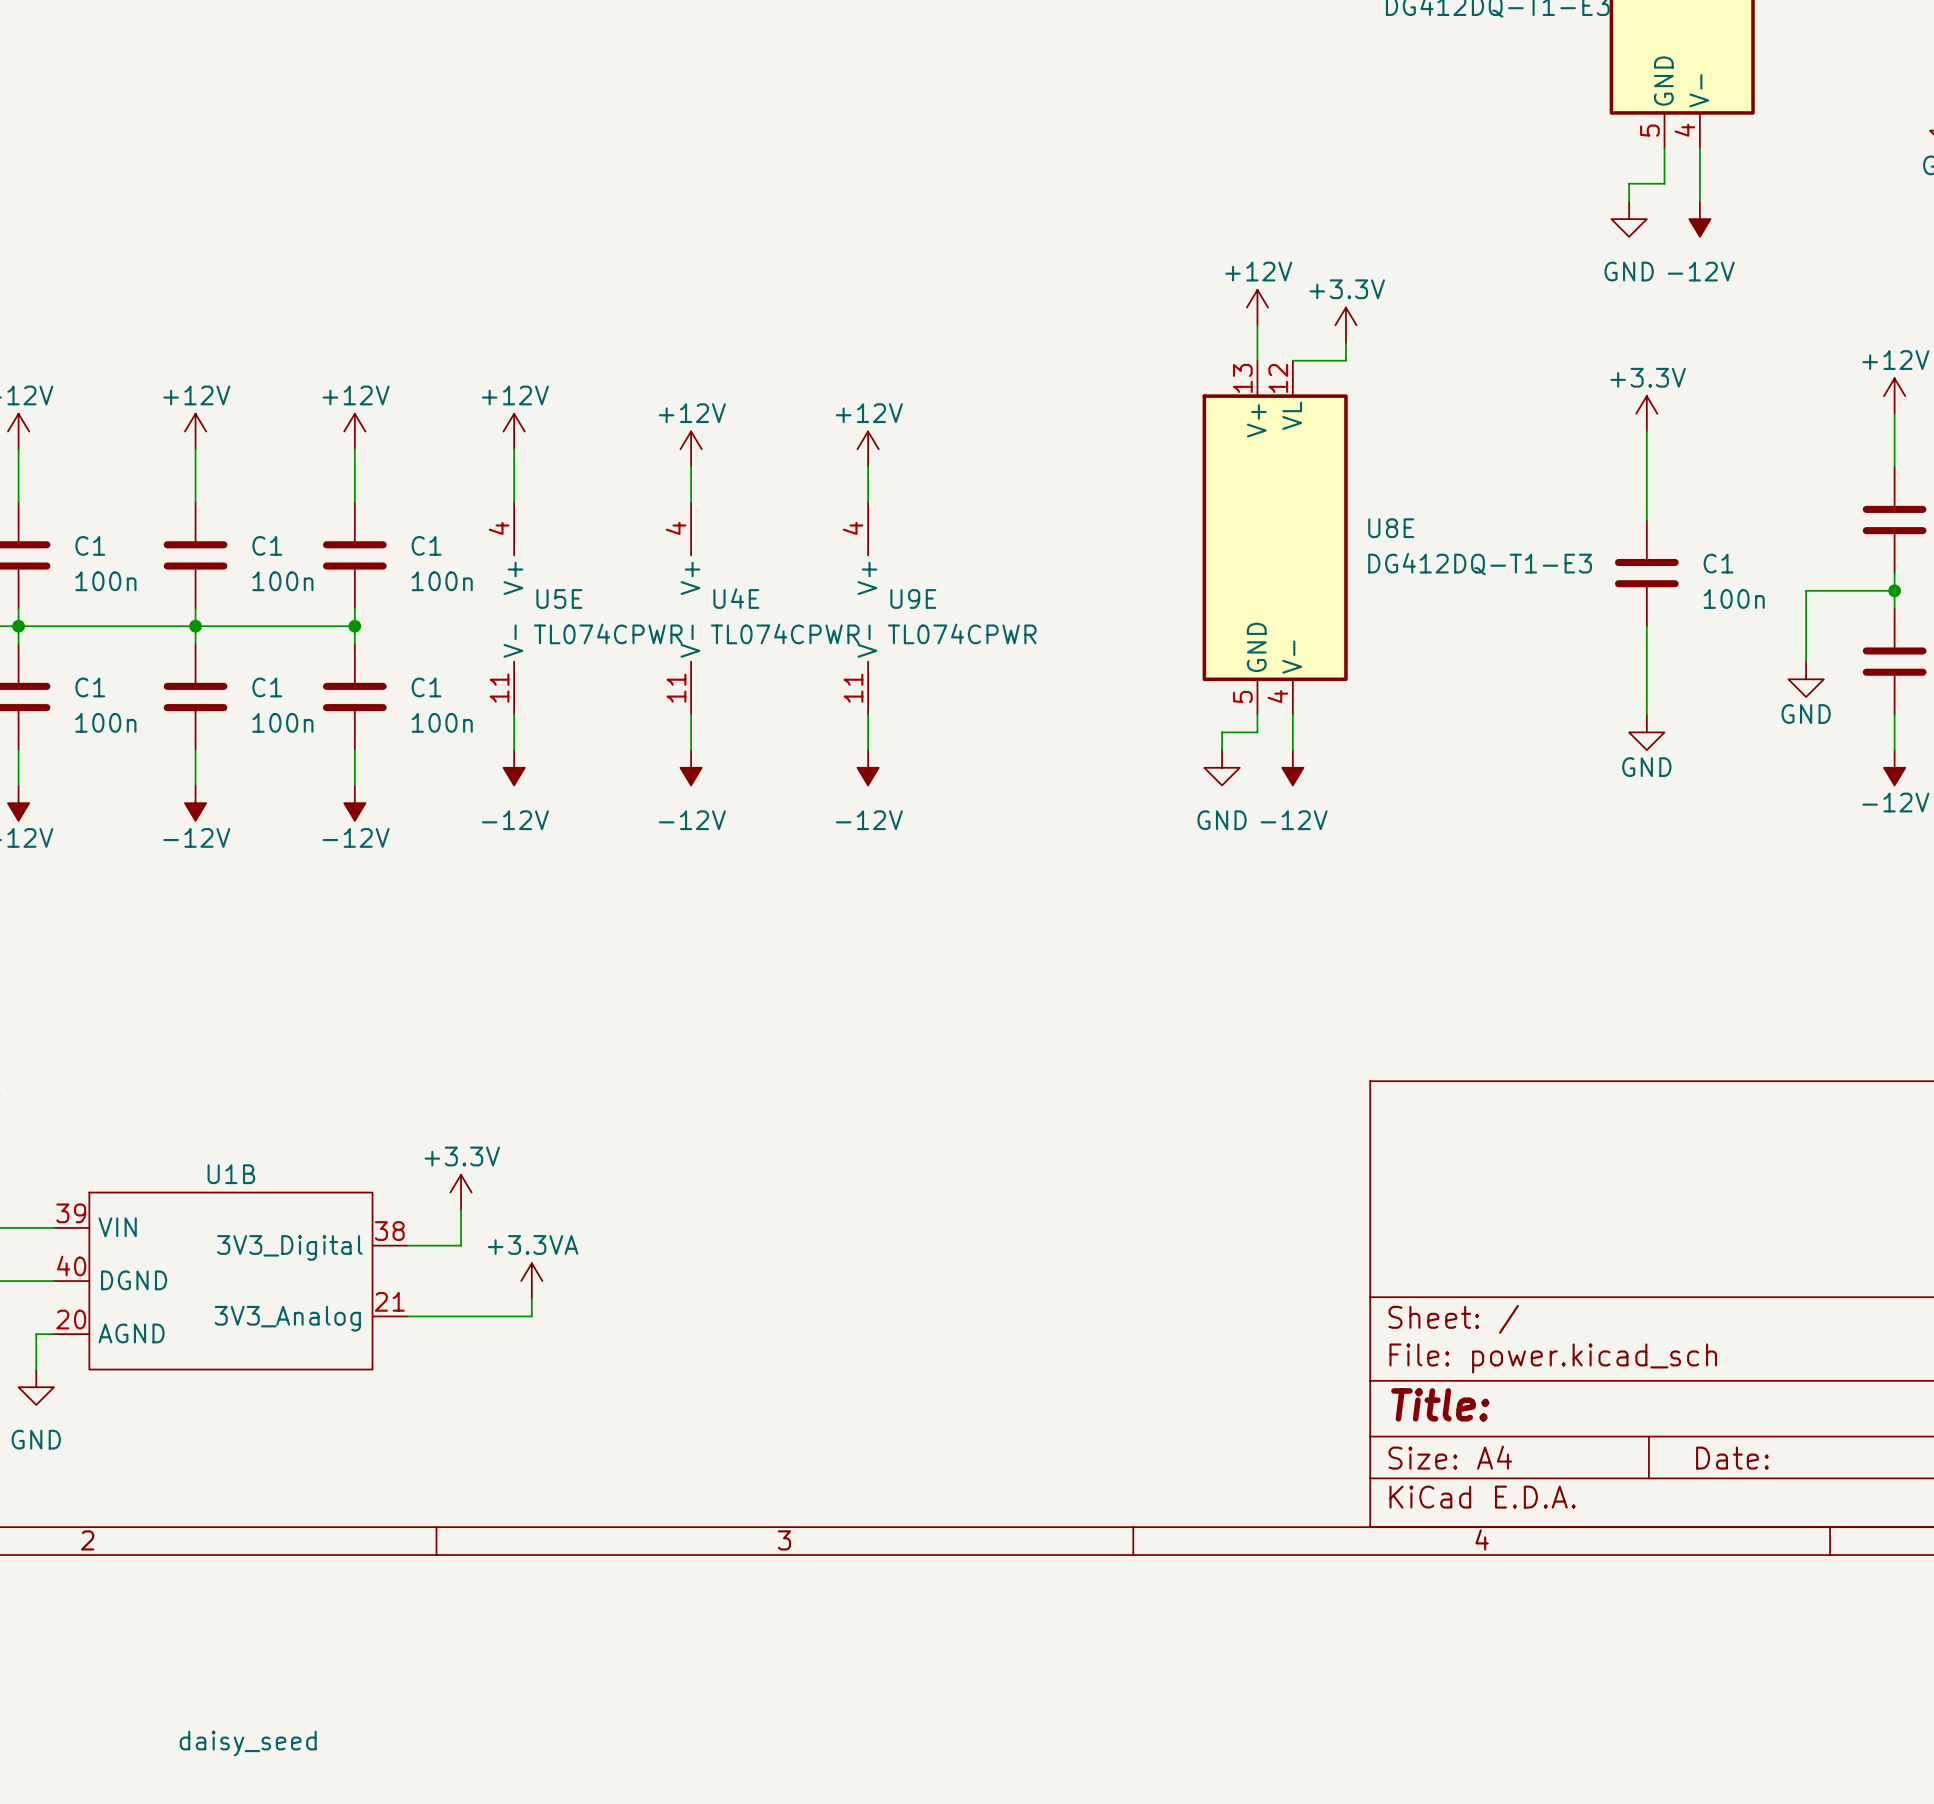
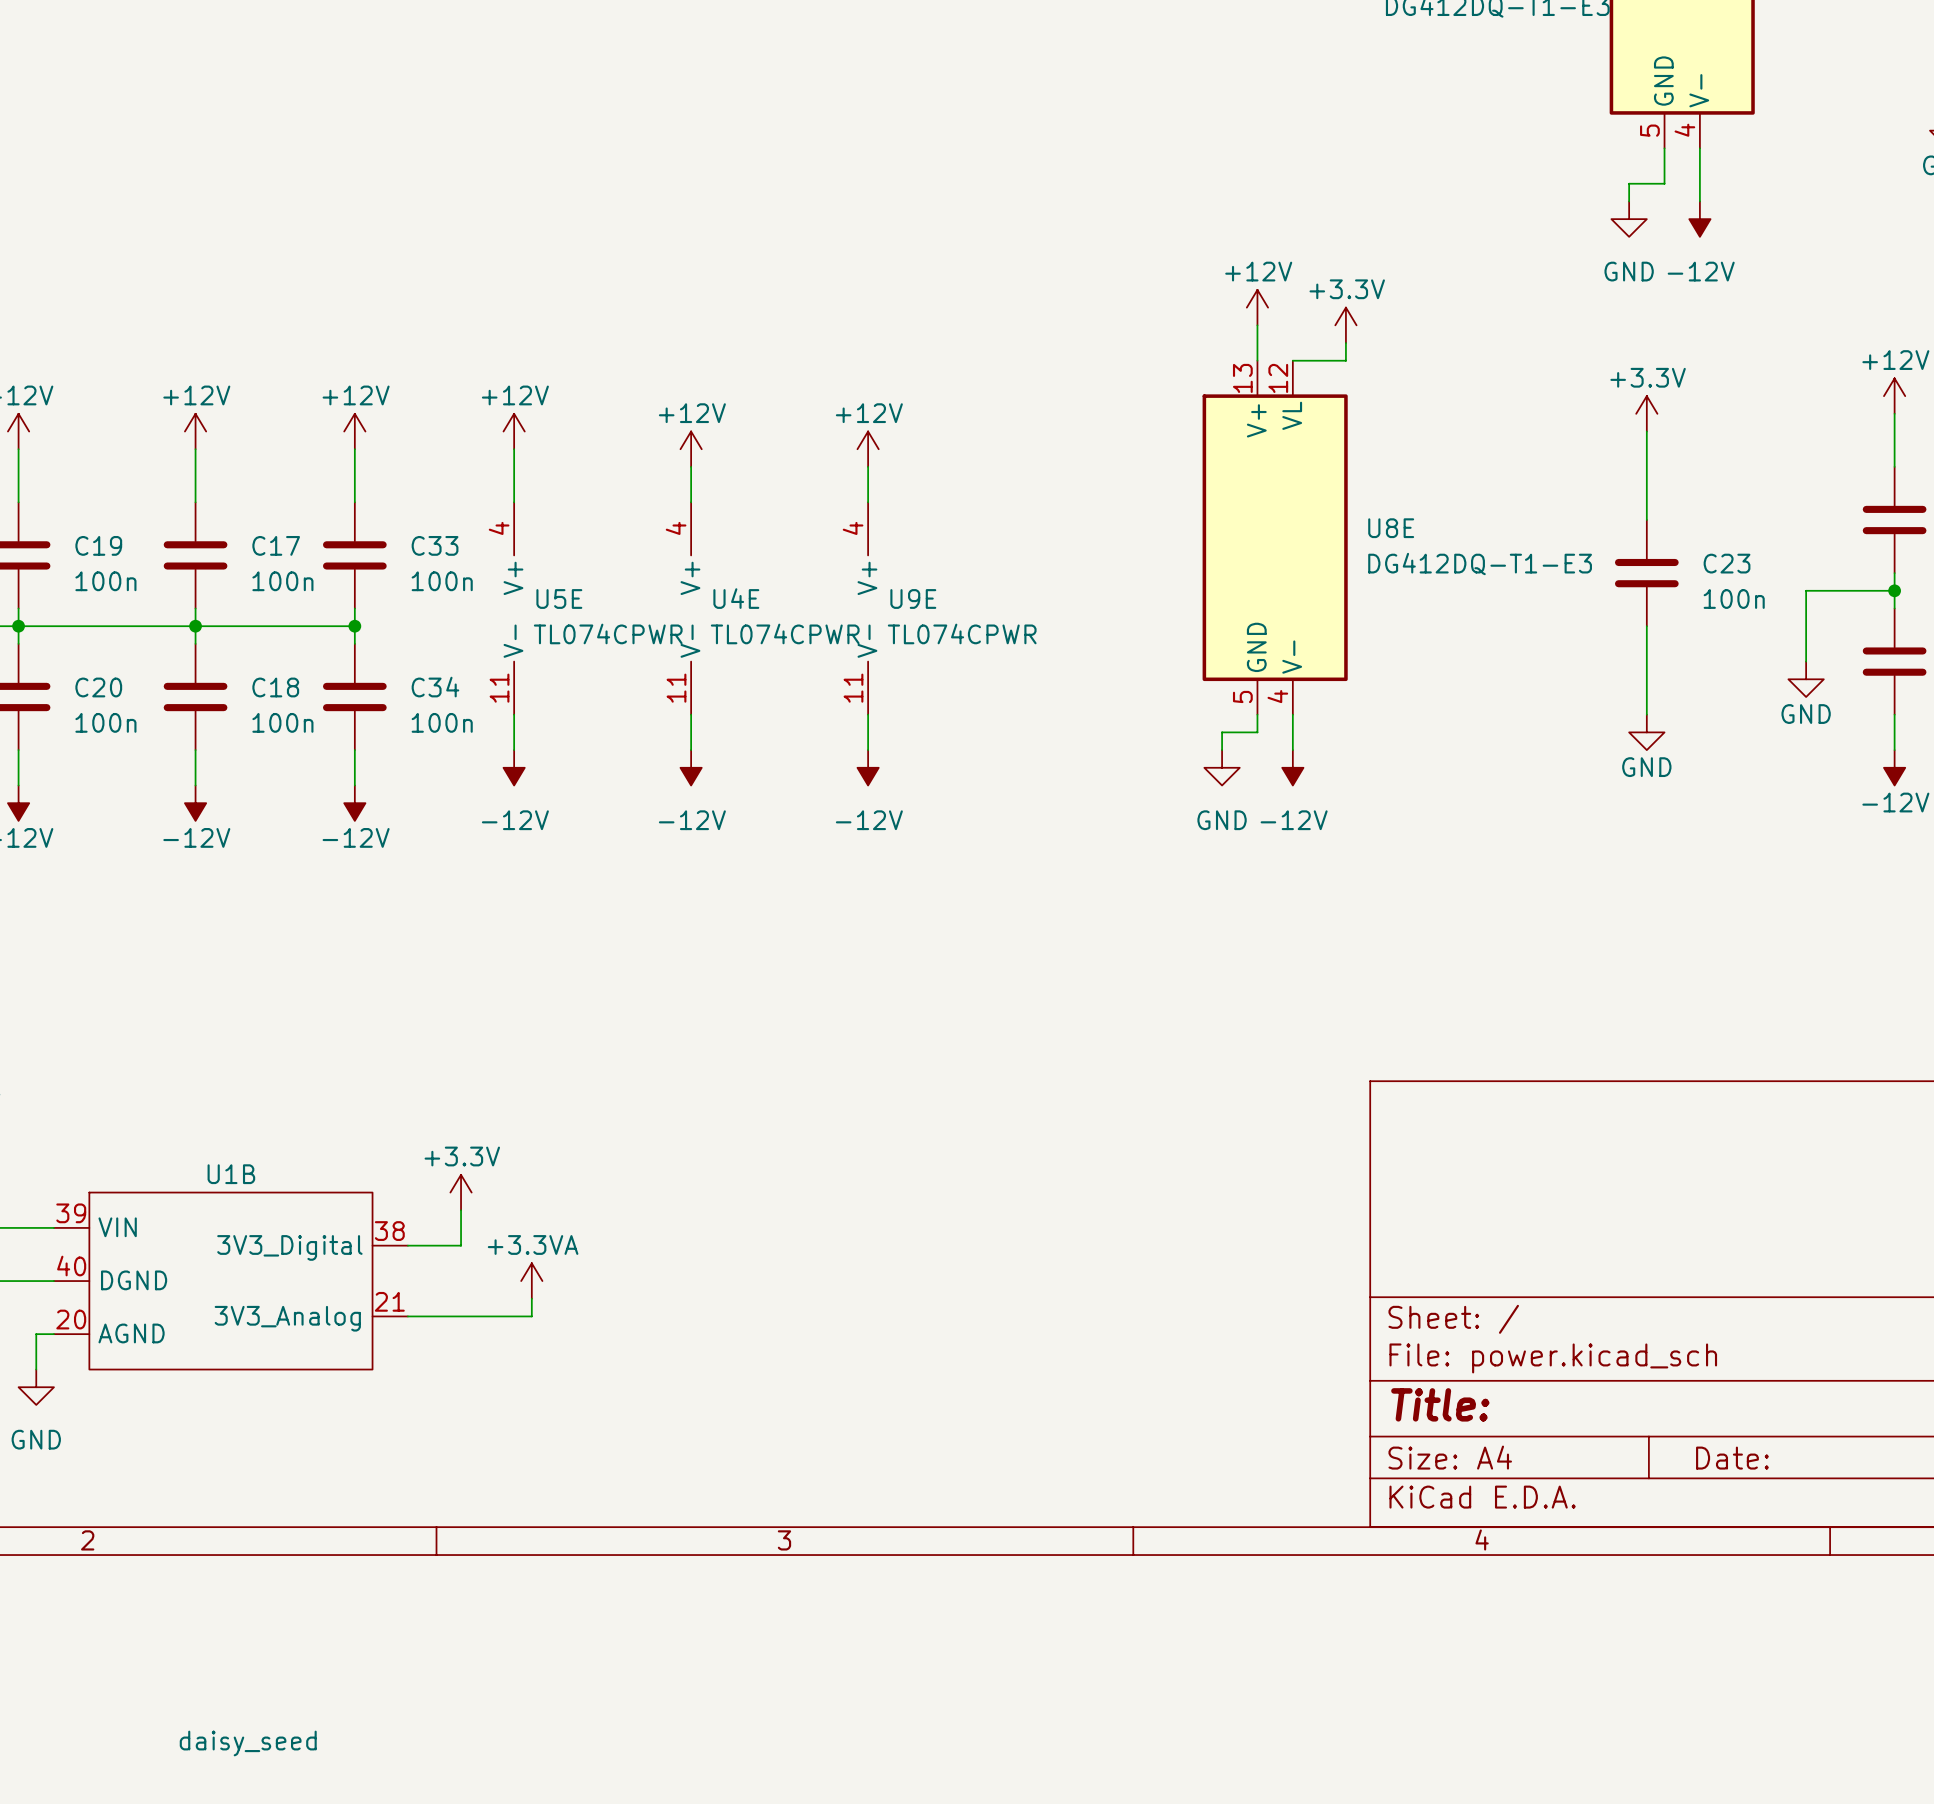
C1 name: C1 (90, 545) -> C19 (98, 545)
C1 name: C1 (267, 545) -> C17 (276, 545)
C1 name: C1 (426, 545) -> C33 (435, 545)
C1 name: C1 (1718, 563) -> C23 (1727, 563)
C1 name: C1 (90, 687) -> C20 (98, 687)
C1 name: C1 (267, 687) -> C18 (275, 687)
C1 name: C1 (426, 687) -> C34 (435, 687)

